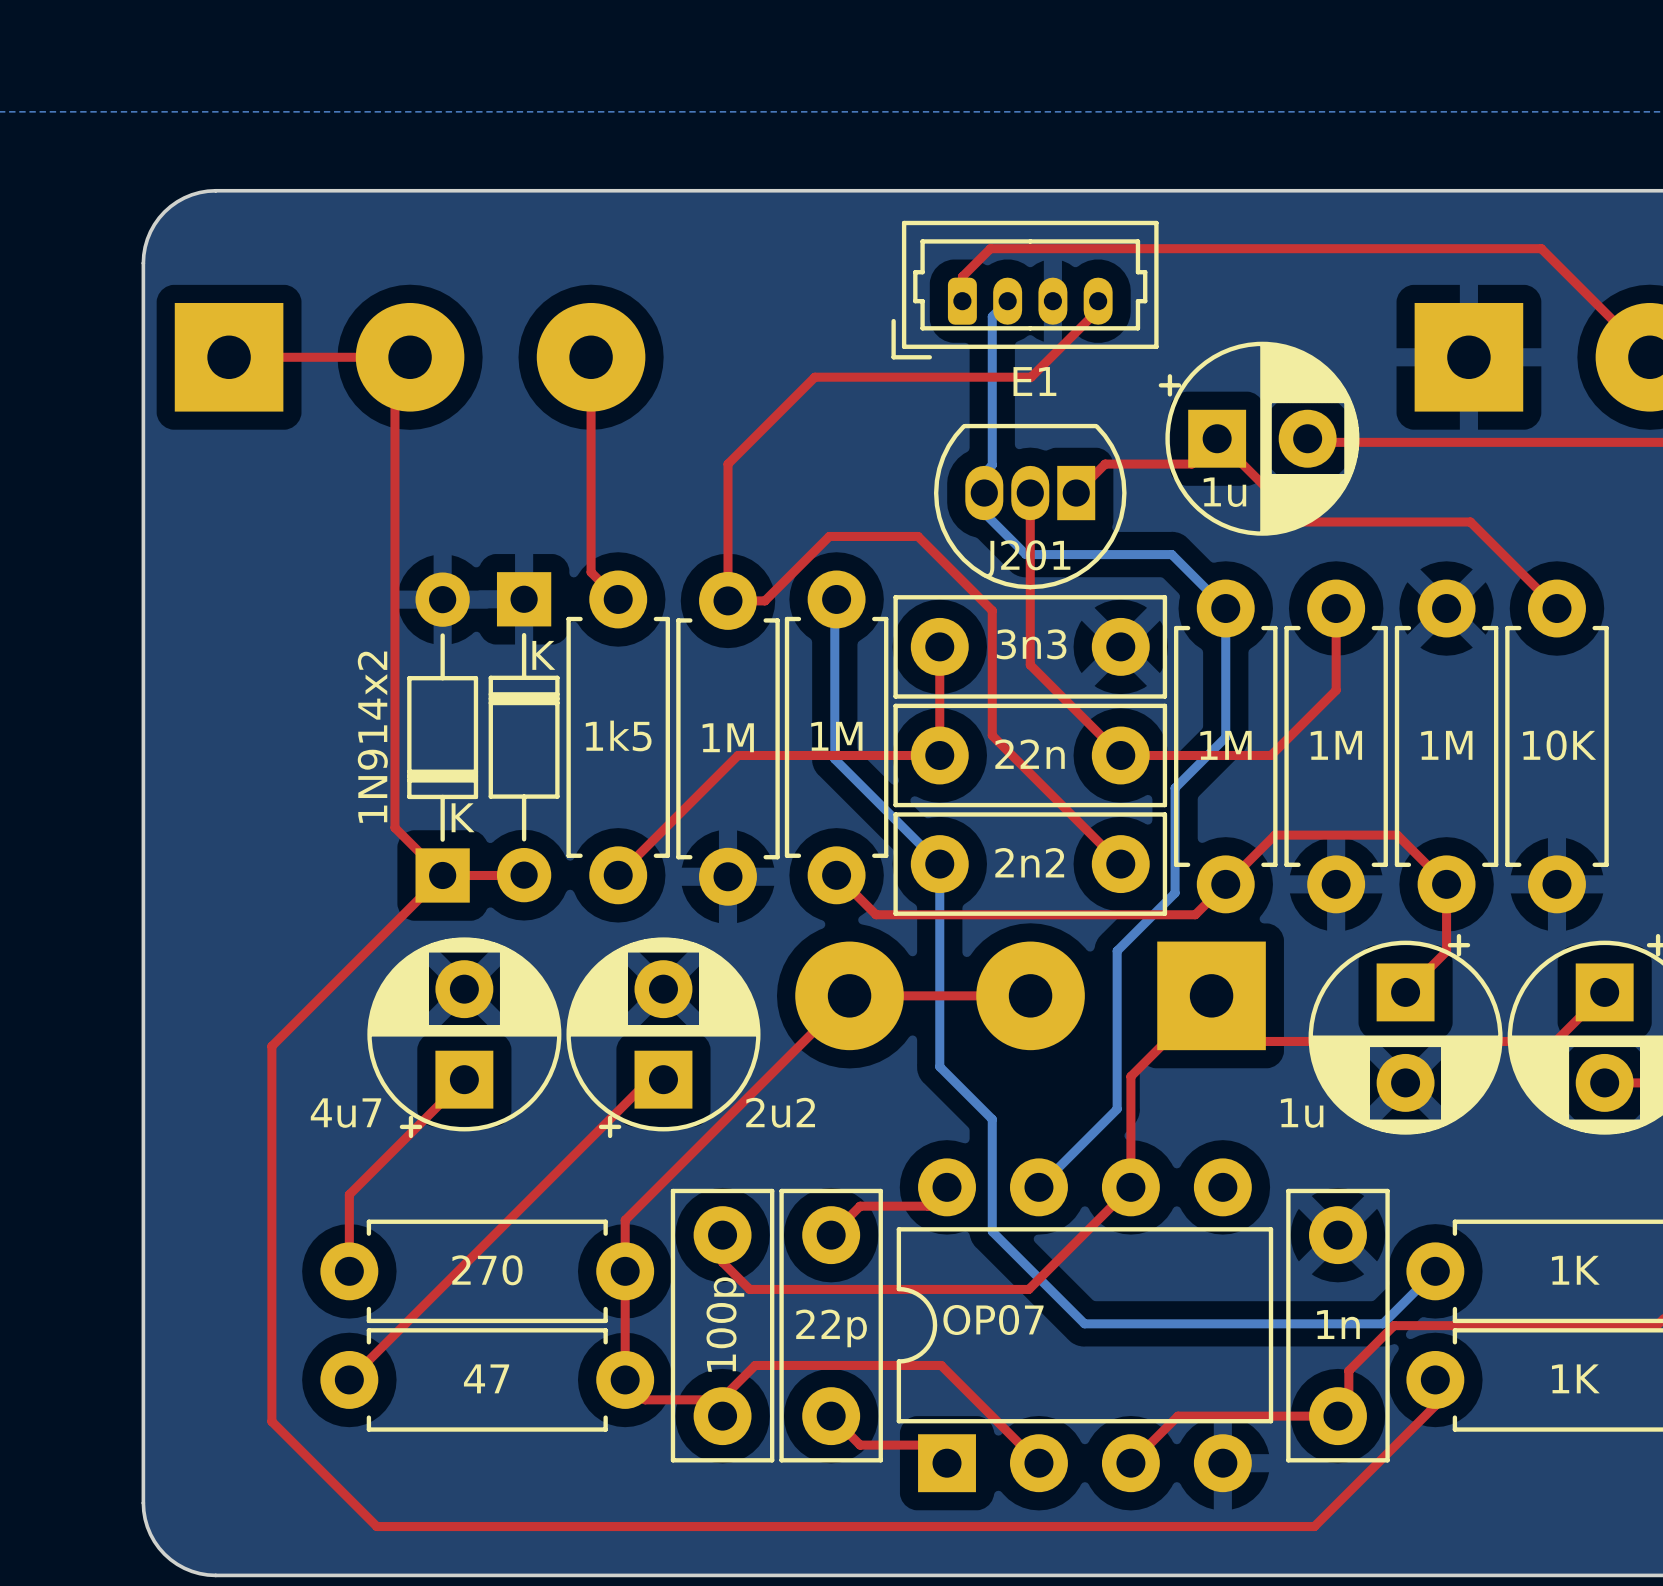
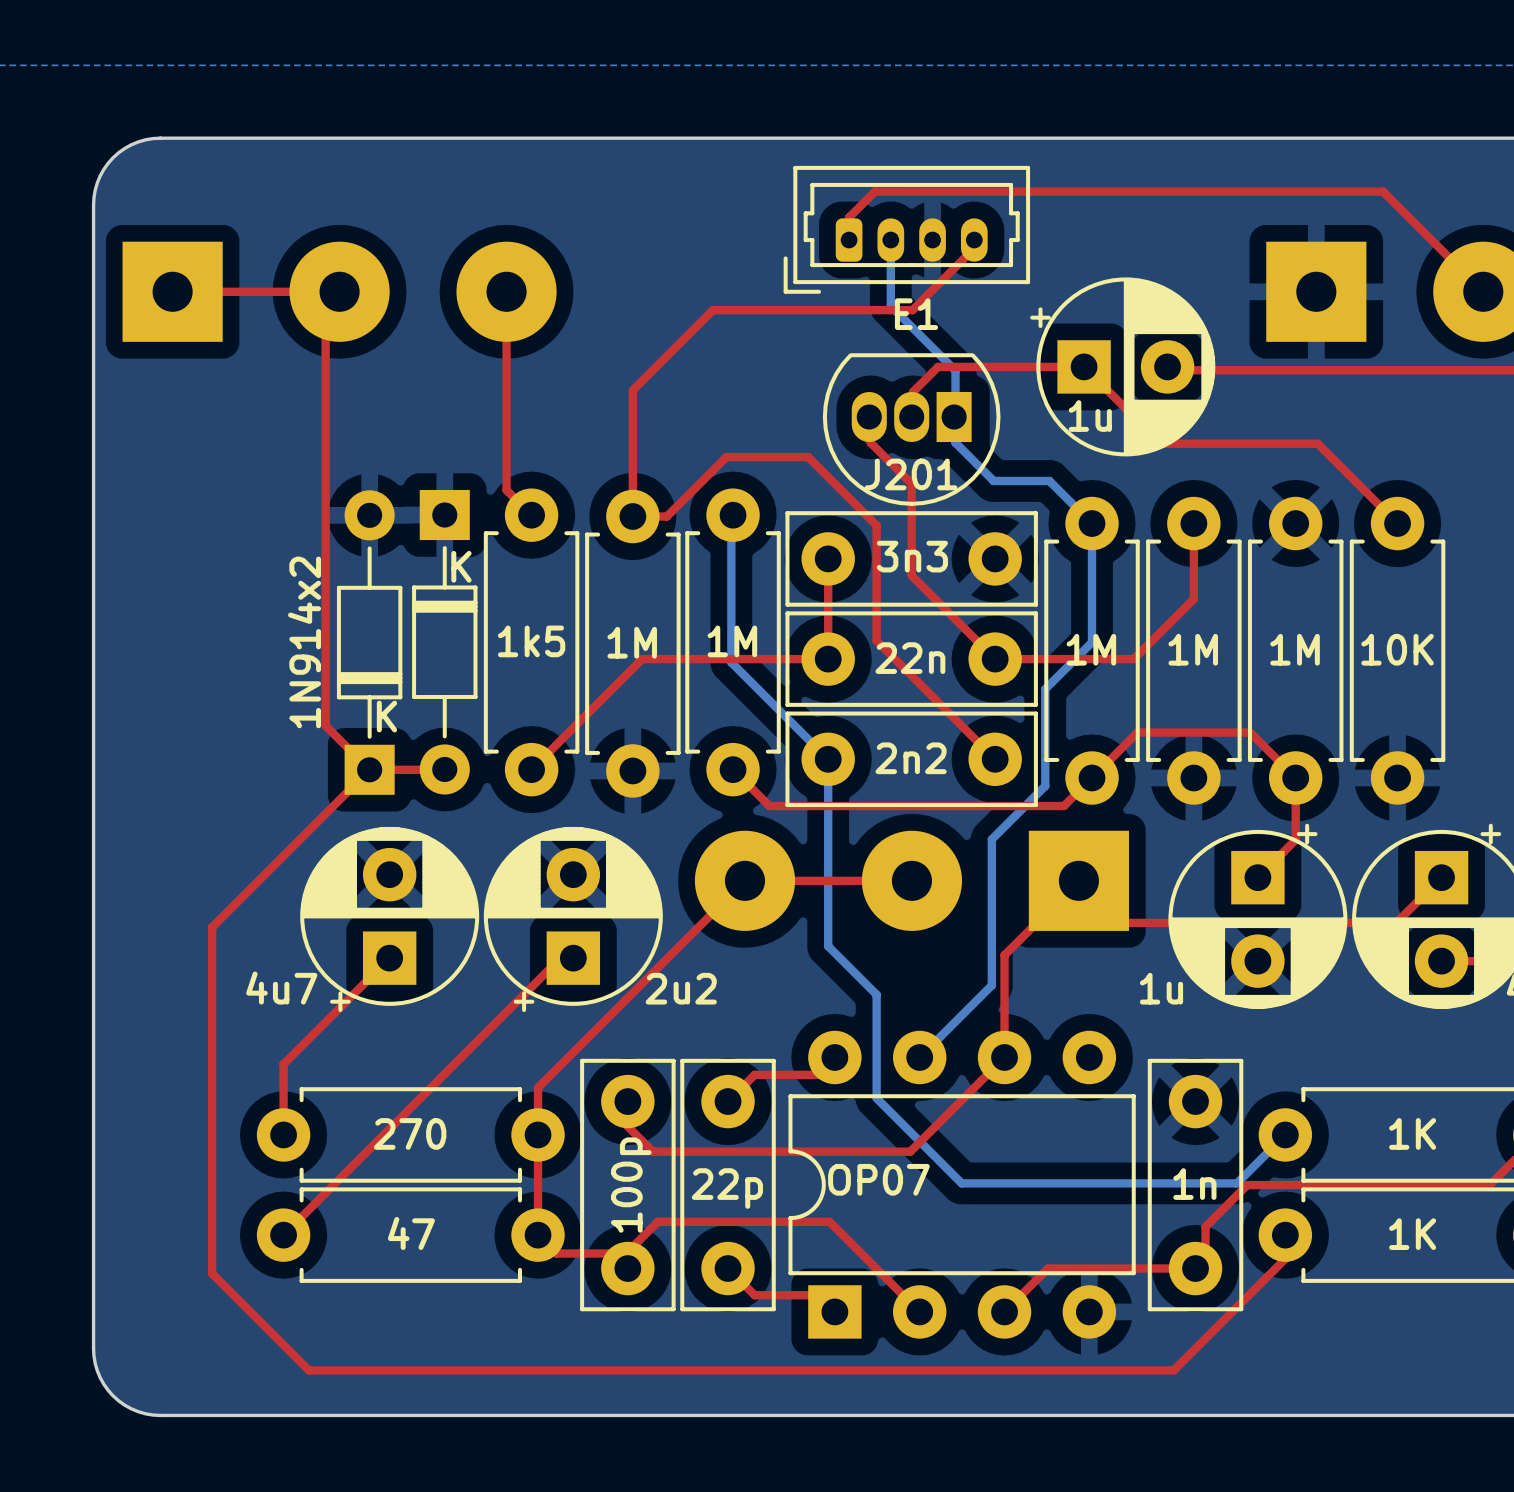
bottom track: (1007, 301) (992, 316) (992, 465) (984, 473) (984, 512) (1025, 554) (1171, 554) (1179, 562) -> (890, 240) (890, 306) (955, 370) (955, 442) (993, 480) (1049, 480)
top track: (1217, 438) (1191, 464) (1105, 464) (1076, 493) -> (1084, 366) (938, 366) (913, 391) (913, 417)
top track: (1030, 493) (1030, 565) -> (870, 417) (870, 442) (911, 483)

